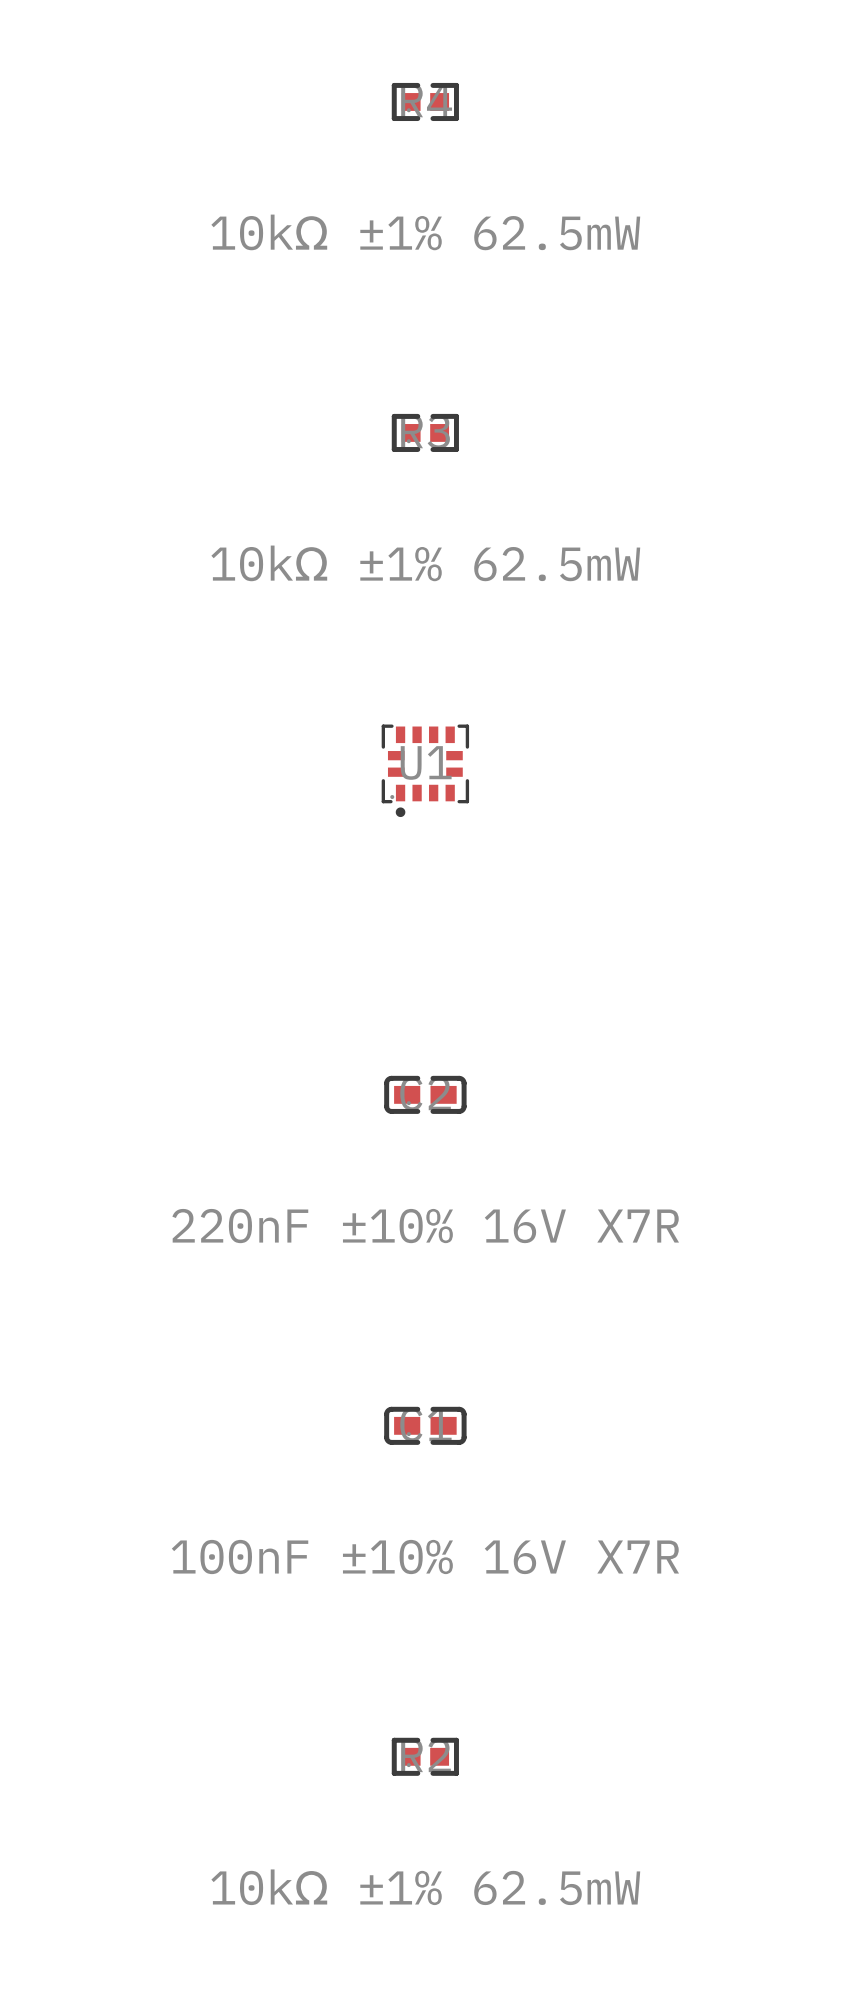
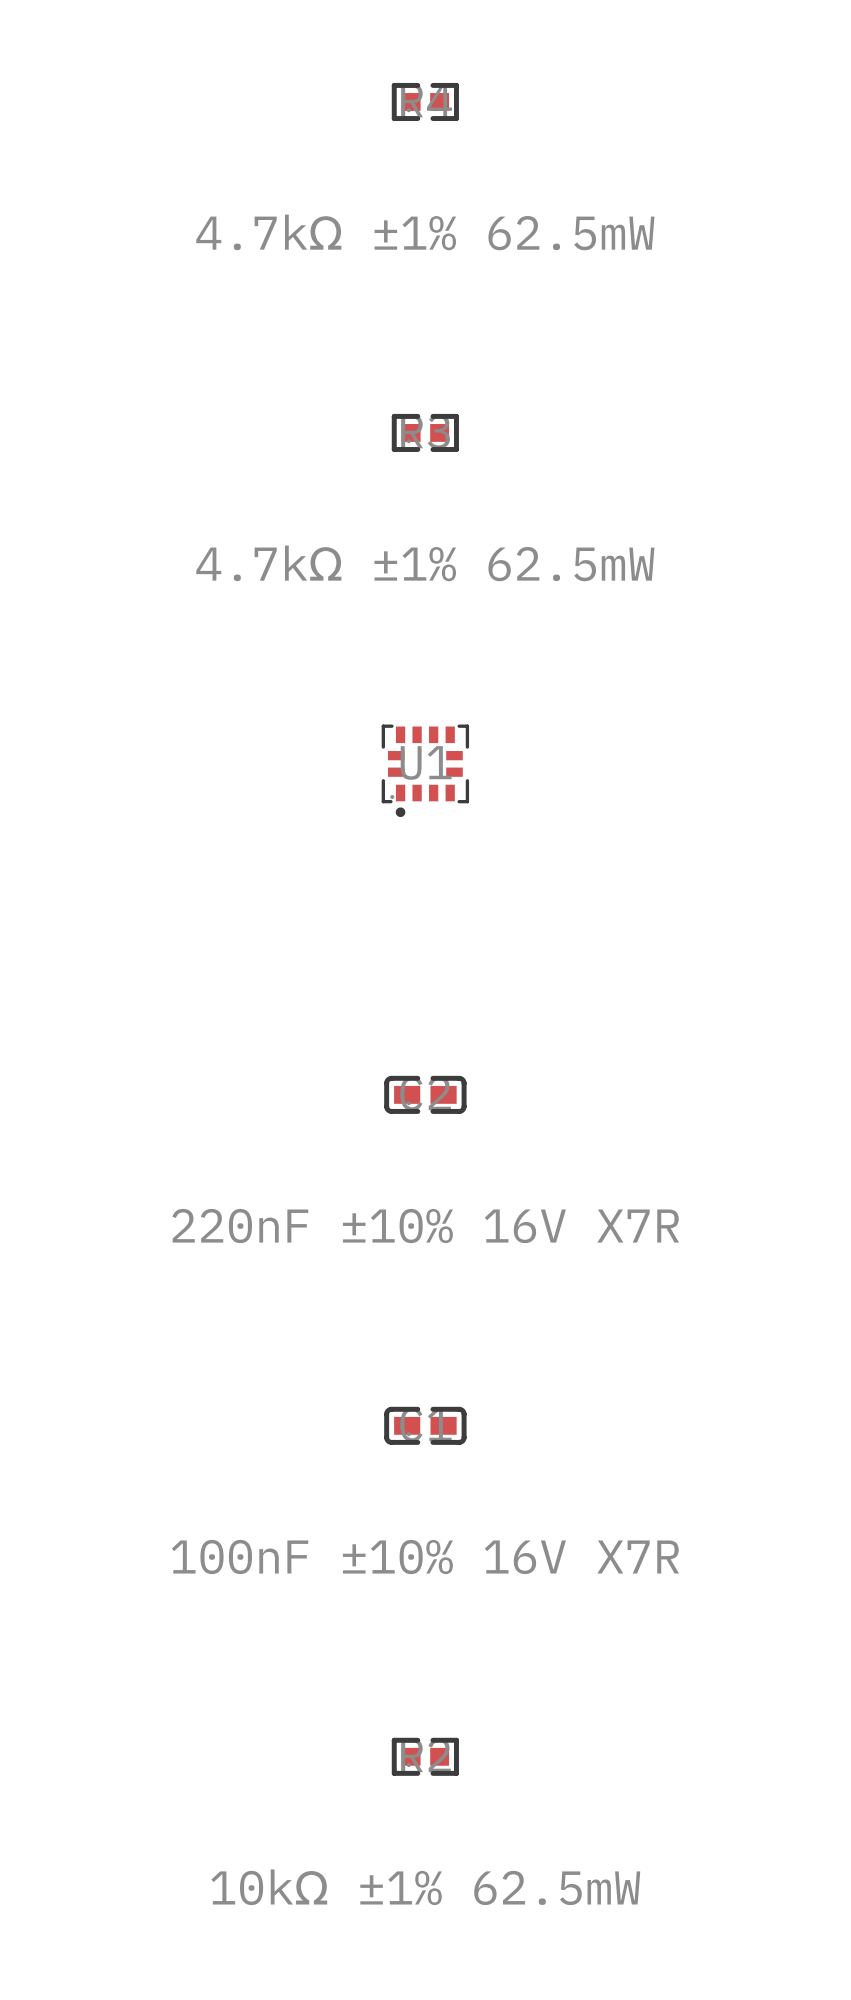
part value: 10kΩ ±1% 62.5mW (425, 232) -> 4.7kΩ ±1% 62.5mW (425, 232)
part value: 10kΩ ±1% 62.5mW (425, 563) -> 4.7kΩ ±1% 62.5mW (425, 563)

